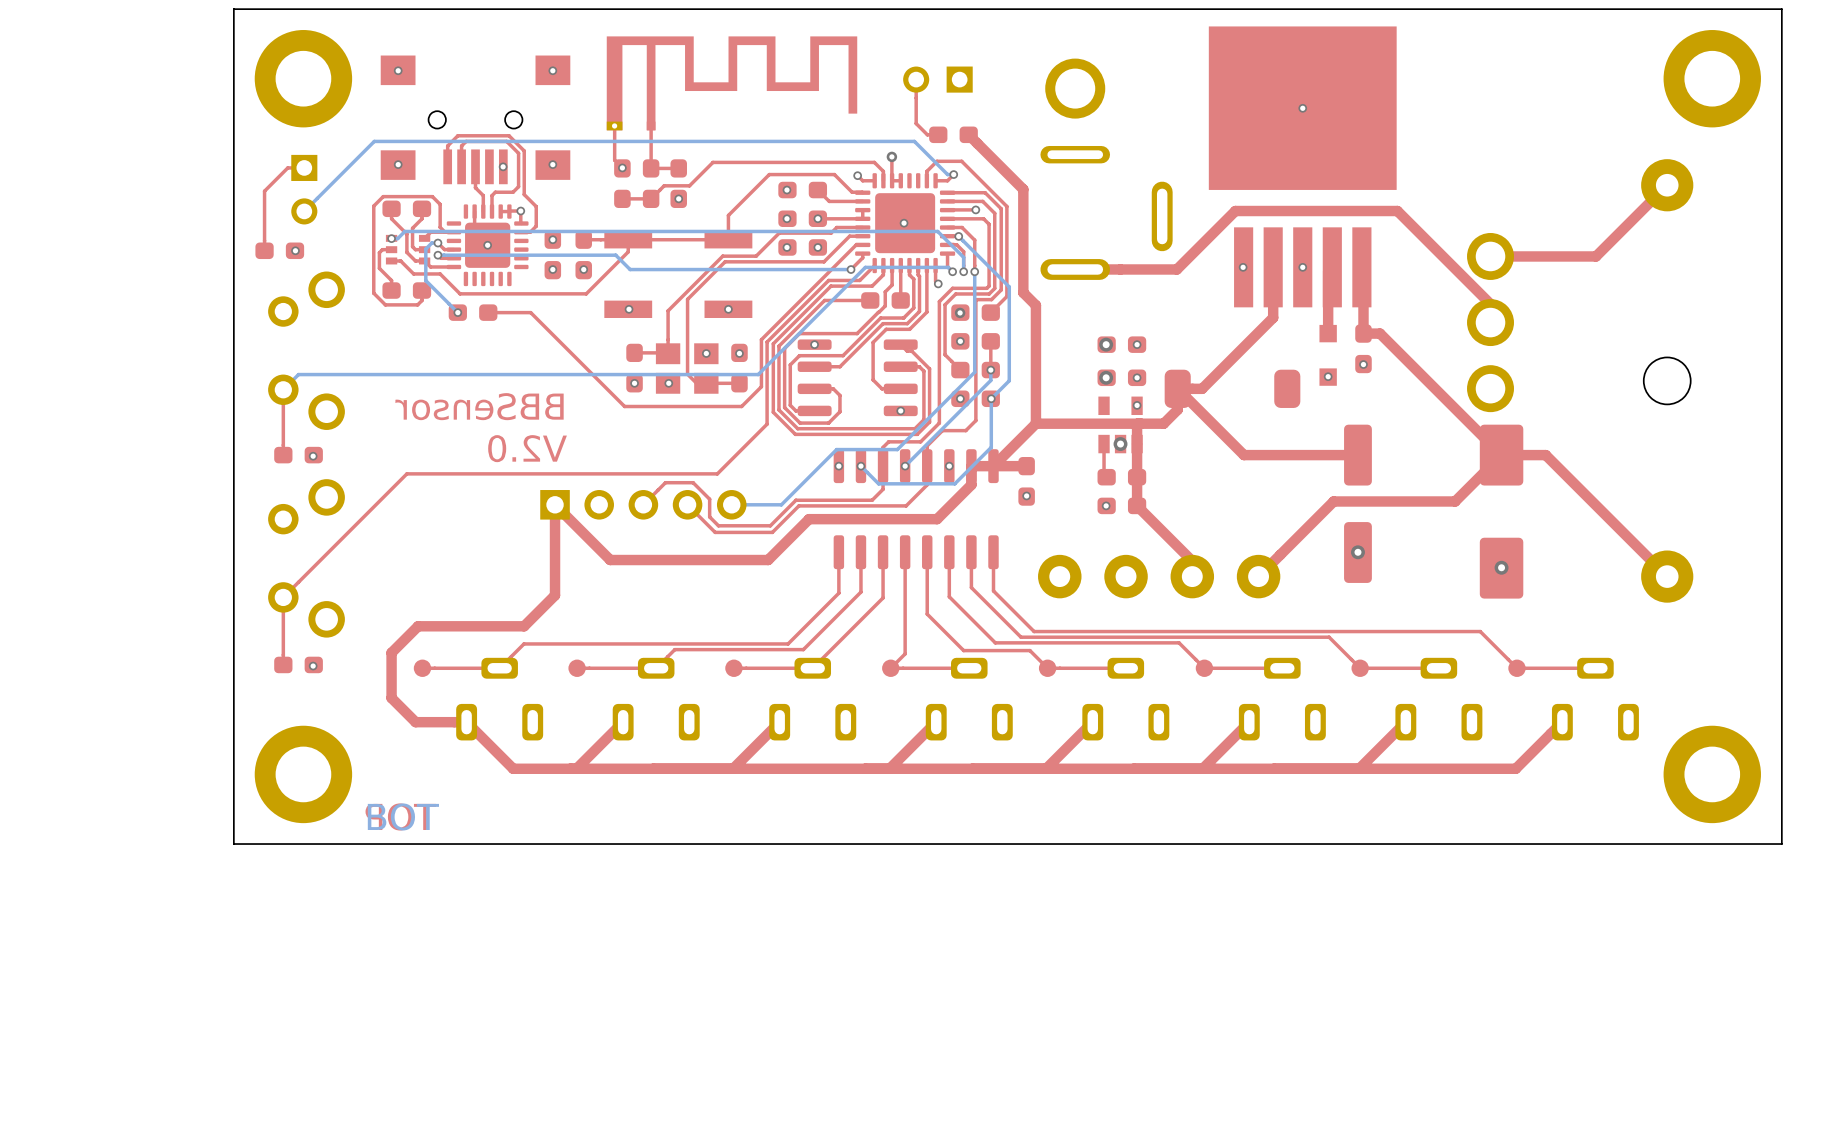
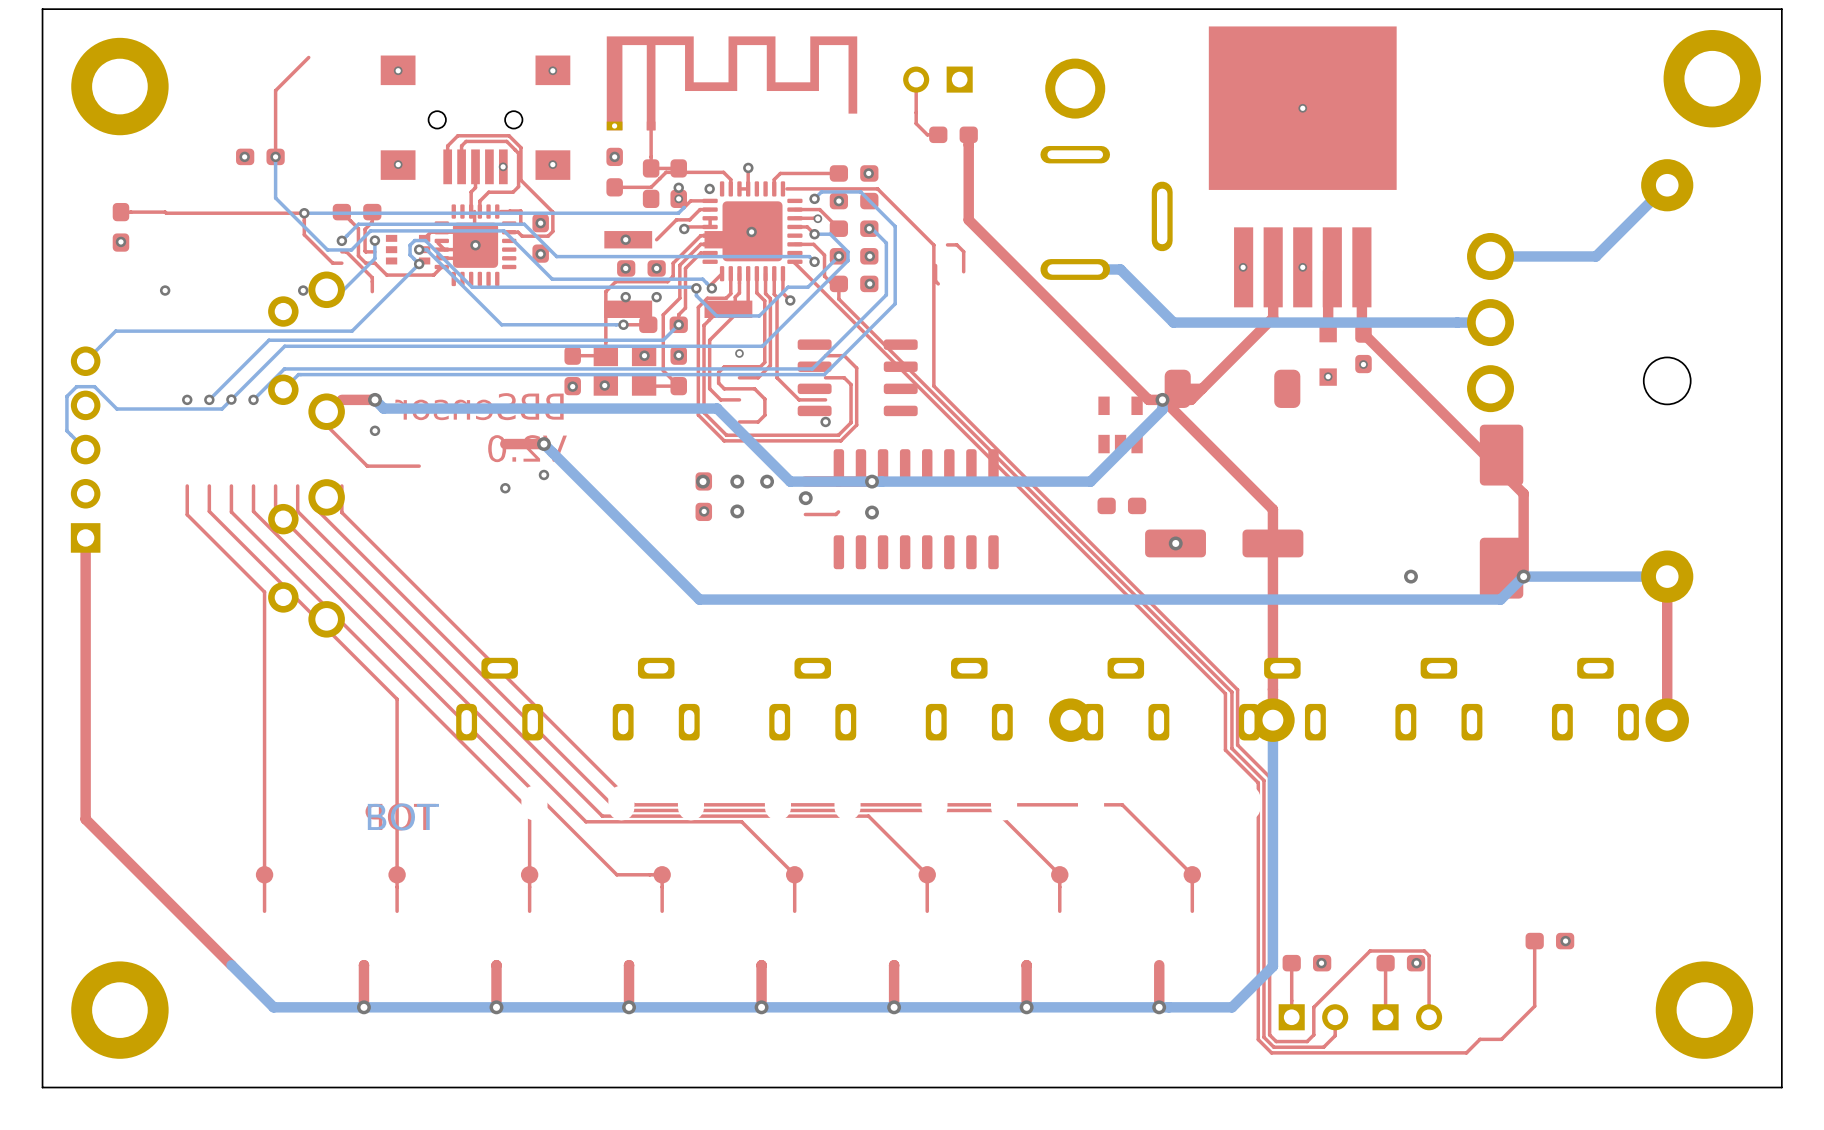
board edge: (233, 9) (233, 844) (1781, 844) -> (233, 9) (42, 9) (42, 1087) (1781, 1087) (1781, 844)
top track: none -> (308, 57) (275, 90) (275, 156)
part position: (303, 78) -> (119, 86)
top track: (614, 126) (614, 160) (622, 167) -> none
top track: (968, 134) (1023, 189) (1023, 292) (1035, 305) (1035, 423) -> (968, 134) (968, 220) (1148, 399) (1191, 399) (1202, 388)
top track: (520, 147) (524, 150) (524, 194) (536, 206) (536, 226) (530, 232) (521, 232) -> (520, 147) (520, 180) (552, 212) (552, 231) (548, 236) (522, 236) (518, 232) (509, 232)
via: none -> (244, 156)
part: none -> (260, 156)
bottom track: none -> (275, 156) (275, 198) (327, 249) (351, 249) (370, 230) (503, 230) (552, 279) (702, 279) (711, 288)
via: none -> (275, 156)
via: none -> (614, 156)
top track: (891, 156) (891, 180) -> none
via position: (891, 156) -> (868, 173)
top track: (304, 167) (287, 167) (264, 191) (264, 250) -> none
via: (622, 167) -> none
via: none -> (748, 167)
top track: none -> (748, 168) (748, 188) (739, 188)
top track: none -> (838, 173) (780, 173) (774, 179) (774, 188)
part: none -> (854, 173)
top track: (953, 174) (947, 180) (935, 180) -> none
bottom track: (953, 174) (947, 174) (914, 141) (374, 141) (304, 211) -> none
via: (953, 174) -> none
top track: (857, 175) (862, 180) (874, 180) -> none
via: (857, 175) -> none
top track: (883, 180) (883, 171) (874, 162) (712, 162) (689, 185) (664, 185) (651, 198) (622, 198) -> none
top track: (900, 180) (892, 180) -> none
top track: (926, 180) (926, 171) (936, 161) (961, 161) (1006, 206) (1006, 296) (990, 312) -> none
part position: (622, 183) -> (614, 172)
top track: (1667, 185) (1596, 256) (1490, 256) -> none
bottom track: none -> (1667, 185) (1596, 256) (1490, 256)
top track: (475, 187) (483, 195) (483, 211) -> (475, 187) (471, 192) (471, 211)
top track: none -> (614, 187) (651, 187) (666, 172) (723, 172) (730, 179) (730, 188)
via: none -> (678, 187)
via: none -> (709, 188)
top track: none -> (786, 188) (877, 188) (933, 245) (933, 386) (1237, 689) (1237, 745) (1269, 777) (1269, 1034) (1276, 1041) (1307, 1041) (1313, 1034) (1313, 1007) (1370, 950) (1424, 950) (1429, 955) (1429, 1017)
part: (304, 189) -> none
via: (786, 190) -> none
part: (802, 190) -> none
top track: (817, 190) (829, 201) (862, 201) -> none
top track: (495, 192) (492, 195) (492, 211) -> (495, 192) (488, 192) (479, 201) (479, 211)
top track: (862, 192) (852, 192) (834, 174) (769, 174) (728, 215) (728, 239) (583, 239) -> none
top track: (947, 192) (985, 192) (1001, 208) (1001, 289) (991, 299) (975, 299) (975, 420) (965, 430) (942, 430) (927, 445) (927, 484) (906, 505) (798, 505) (772, 532) (715, 532) (687, 504) -> none
via: none -> (814, 198)
top track: none -> (710, 200) (690, 200) (684, 207)
via: none -> (838, 201)
part: none -> (854, 201)
top track: (947, 201) (982, 201) (994, 213) (994, 288) (989, 293) (955, 293) (945, 304) (945, 354) (960, 370) -> none
bottom track: none -> (684, 207) (678, 213) (304, 213)
top track: (391, 208) (391, 218) (406, 234) (406, 252) (415, 260) (424, 260) (430, 266) (453, 266) -> none
part: (406, 208) -> none
top track: (422, 208) (422, 218) (412, 228) (412, 246) (415, 249) (424, 249) -> none
top track: none -> (710, 209) (700, 209) (689, 219) (676, 219) (656, 239)
top track: none -> (794, 209) (819, 209) (838, 228)
top track: (975, 209) (947, 209) -> none
via: (975, 209) -> none
top track: (862, 210) (862, 218) (817, 218) -> none
via: (520, 211) -> none
top track: none -> (120, 212) (304, 213) (304, 234) (332, 263) (341, 263)
top track: none -> (341, 212) (358, 228) (358, 255) (365, 263) (374, 263) (386, 275) (433, 275) (441, 266)
part: none -> (357, 212)
top track: none -> (372, 212) (372, 222) (365, 229) (365, 251) (374, 251)
via: none -> (304, 213)
top track: none -> (710, 218) (710, 226) (686, 226) (684, 228)
via: (786, 218) -> none
top track: none -> (794, 218) (814, 218)
part: (802, 218) -> none
top track: (947, 218) (983, 218) (989, 224) (989, 286) (986, 288) (952, 288) (939, 301) (939, 423) (920, 441) (888, 441) (883, 447) (883, 489) (872, 500) (795, 500) (770, 525) (718, 525) (709, 516) (709, 499) (693, 482) (665, 482) (643, 504) -> none
via: none -> (540, 223)
via: (904, 223) -> none
part position: (905, 223) -> (752, 231)
top track: none -> (794, 226) (807, 226) (814, 234)
part: none -> (120, 227)
top track: (862, 227) (836, 227) (831, 233) (779, 233) (756, 256) (722, 256) (668, 310) (668, 353) (634, 352) -> none
top track: (947, 227) (962, 227) (974, 240) (974, 271) -> none
via: none -> (684, 228)
part: none -> (854, 228)
bottom track: none -> (869, 228) (872, 228) (886, 243) (886, 294) (812, 368) (284, 368) (253, 399)
via: none -> (869, 228)
top track: (445, 232) (440, 227) (440, 204) (432, 196) (383, 196) (373, 206) (373, 293) (385, 304) (417, 304) (422, 300) (422, 290) -> none
via: none -> (751, 232)
bottom track: none -> (814, 234) (830, 234) (848, 251) (848, 260) (762, 346) (284, 346) (221, 409) (116, 409) (94, 386) (76, 386) (66, 396) (66, 430) (85, 449)
via: none -> (814, 234)
top track: none -> (710, 235) (700, 235) (673, 263) (673, 276) (667, 281) (615, 281) (605, 291) (605, 355) (572, 355)
top track: (862, 236) (849, 236) (824, 261) (725, 261) (687, 299) (687, 374) (696, 383) (739, 383) -> none
bottom track: (958, 236) (1009, 286) (1009, 380) (991, 398) (991, 447) (954, 483) (878, 483) (860, 466) -> none
via: (958, 236) -> none
bottom track: (391, 238) (397, 238) (404, 231) (937, 231) (963, 257) (963, 271) -> none
via: (391, 238) -> none
via: (552, 239) -> none
via: none -> (625, 239)
top track: (628, 239) (628, 251) (586, 293) (460, 293) (440, 273) (413, 273) (400, 260) (391, 260) -> none
bottom track: none -> (341, 240) (358, 224) (524, 224) (556, 256) (809, 256) (814, 261)
via: none -> (341, 240)
bottom track: none -> (374, 240) (374, 258) (341, 291)
via: none -> (374, 240)
via: none -> (120, 241)
bottom track: (437, 243) (431, 243) (425, 249) (425, 280) (457, 312) -> none
via: (437, 243) -> none
top track: none -> (710, 244) (700, 244) (679, 265) (679, 298) (663, 314) (663, 370) (678, 386) (644, 385)
top track: none -> (794, 244) (813, 244) (824, 255) (824, 276) (832, 283) (838, 283) (838, 299) (1231, 692) (1231, 748) (1263, 780) (1263, 1037) (1273, 1047) (1323, 1047) (1335, 1035) (1335, 1017)
top track: (862, 244) (856, 244) (761, 339) (761, 386) (741, 406) (624, 406) (530, 312) (488, 312) -> none
via: none -> (475, 245)
part position: (487, 245) -> (475, 245)
via: (487, 245) -> none
via: (786, 247) -> none
part: (802, 247) -> none
via: (817, 247) -> none
top track: (391, 249) (382, 249) (379, 252) (379, 268) (391, 280) (391, 290) -> none
bottom track: none -> (419, 249) (426, 249) (501, 324) (623, 324)
via: none -> (419, 249)
part: (279, 250) -> none
via: (295, 250) -> none
top track: none -> (341, 251) (346, 251) (372, 277) (372, 291)
top track: none -> (710, 253) (700, 253) (685, 268) (685, 308) (678, 314) (678, 324)
top track: (862, 253) (862, 257) (851, 269) -> none
top track: (947, 253) (947, 266) (952, 271) -> none
via: none -> (540, 254)
part position: (552, 254) -> (540, 238)
part: (583, 254) -> none
bottom track: (437, 255) (615, 255) (630, 269) (851, 269) -> none
via: (437, 255) -> none
bottom track: none -> (838, 256) (807, 287) (788, 287) (759, 315) (716, 315) (696, 295) (695, 287) (472, 287) (425, 240) (414, 240) (410, 245) (410, 254) (419, 264) (352, 331) (115, 331) (85, 361)
via: none -> (838, 256)
part: none -> (854, 256)
via: none -> (869, 256)
top track: none -> (794, 261) (1225, 693) (1225, 749) (1258, 782) (1258, 1039) (1271, 1052) (1466, 1052) (1480, 1039) (1501, 1039) (1534, 1006) (1534, 941)
via: none -> (814, 261)
via: none -> (419, 264)
top track: (874, 265) (859, 280) (828, 280) (767, 342) (767, 424) (717, 473) (406, 473) (283, 597) (283, 664) -> none
top track: (883, 265) (883, 274) (872, 286) (830, 286) (773, 343) (773, 412) (795, 434) (917, 434) (929, 422) (929, 368) (911, 351) (907, 351) (900, 344) -> none
top track: (892, 265) (892, 285) (885, 291) (885, 306) (857, 333) (799, 333) (784, 348) (784, 407) (800, 423) (828, 423) (839, 411) (839, 395) (833, 388) (814, 388) -> none
top track: (900, 265) (900, 300) -> none
top track: (909, 265) (909, 274) (913, 279) (913, 307) (903, 318) (880, 318) (843, 355) -> (730, 273) (730, 293) (726, 298) (707, 298) (698, 307) (698, 415) (724, 440) (840, 440) (856, 425) (856, 368) (843, 355)
top track: (918, 265) (919, 311) (907, 323) (883, 323) (839, 366) (814, 366) -> none
top track: (926, 265) (926, 312) (909, 329) (886, 329) (873, 342) (873, 379) (882, 388) (900, 388) -> none
top track: (1361, 267) (1363, 268) (1363, 333) (1380, 333) (1501, 455) -> (1361, 267) (1361, 332) (1523, 493) (1523, 576)
via: none -> (625, 268)
part: none -> (641, 268)
via: none -> (656, 268)
via: (552, 269) -> none
via: (583, 269) -> none
via: (851, 269) -> none
top track: (1075, 269) (1176, 269) (1235, 211) (1397, 211) (1490, 304) (1490, 322) -> none
bottom track: none -> (1075, 269) (1120, 269) (1173, 322) (1490, 322)
bottom track: (952, 271) (948, 267) (865, 267) (758, 374) -> (814, 198) (821, 191) (860, 191) (895, 226) (895, 303) (824, 374) (758, 374)
via: (952, 271) -> none
via: (963, 271) -> none
bottom track: (974, 271) (974, 372) (897, 449) (836, 449) (781, 504) (731, 504) -> none
via: (974, 271) -> none
top track: none -> (722, 273) (711, 283) (711, 288)
top track: none -> (739, 273) (739, 293) (735, 297) (735, 314) (709, 340) (709, 388) (720, 399) (739, 399)
top track: none -> (748, 273) (748, 311)
top track: none -> (756, 273) (756, 292) (764, 300) (764, 362) (760, 366) (724, 366) (718, 372) (718, 383) (724, 388) (754, 388) (764, 399) (764, 415) (758, 421) (739, 421)
top track: none -> (765, 273) (765, 293) (770, 298) (770, 365) (758, 377) (739, 377)
top track: none -> (774, 273) (774, 294) (777, 297) (777, 377) (799, 399) (825, 399)
top track: none -> (782, 273) (782, 293) (790, 300)
part: none -> (854, 283)
via: none -> (869, 283)
via: (938, 283) -> none
via: none -> (696, 288)
via: none -> (711, 288)
via: none -> (165, 290)
via: none -> (303, 290)
part: (406, 290) -> none
via: none -> (625, 297)
via: none -> (656, 297)
via: none -> (790, 300)
top track: (870, 300) (824, 300) (778, 346) (778, 409) (797, 428) (914, 428) (923, 419) (923, 371) (919, 366) (900, 366) -> none
part: (885, 300) -> none
via: (629, 309) -> none
via: (728, 309) -> none
top track: none -> (717, 311) (704, 325) (704, 412) (726, 435) (838, 435) (851, 422) (851, 384) (844, 377) (825, 377)
via: (457, 312) -> none
part: (473, 312) -> none
via: (960, 312) -> none
part: (975, 312) -> none
via: none -> (623, 324)
top track: none -> (648, 324) (623, 324)
part: none -> (663, 324)
bottom track: none -> (678, 324) (663, 340) (268, 340) (209, 399)
via: none -> (678, 324)
via: (960, 341) -> none
part: (975, 341) -> none
top track: (990, 341) (990, 370) -> none
part footprint: [626, 343, 643, 393] -> [593, 345, 657, 396]
part footprint: [655, 343, 719, 394] -> [670, 346, 687, 396]
via: (814, 344) -> none
via: (1106, 344) -> none
part: (1121, 344) -> none
via: (1137, 344) -> none
via: (706, 353) -> none
via: none -> (644, 355)
via: none -> (678, 355)
top track: (825, 355) (799, 355) (790, 364) (790, 405) (795, 410) (814, 410) -> none
part: (739, 368) -> none
part: none -> (572, 370)
part: (975, 370) -> none
bottom track: (990, 370) (990, 380) (905, 466) -> none
via: (990, 370) -> none
via: (1106, 377) -> none
part: (1121, 377) -> none
via: (1137, 377) -> none
via: (634, 383) -> none
via: (668, 383) -> none
via: none -> (604, 385)
via: none -> (572, 386)
top track: (283, 389) (283, 455) -> none
via: (960, 398) -> none
part: (975, 398) -> none
via: (991, 398) -> none
via: none -> (187, 399)
via: none -> (209, 399)
via: none -> (231, 399)
via: none -> (253, 399)
top track: none -> (319, 399) (319, 418) (367, 466) (419, 466)
top track: none -> (375, 399) (341, 399)
via: none -> (375, 399)
bottom track: none -> (1162, 399) (1162, 409) (1090, 481) (790, 481) (717, 408) (383, 408) (375, 399)
via: none -> (1162, 399)
top track: none -> (1163, 399) (1272, 509) (1272, 720)
via: (1137, 405) -> none
via: (900, 410) -> none
via: none -> (825, 421)
top track: (1035, 423) (993, 466) -> none
top track: (1035, 423) (1163, 423) (1177, 409) (1177, 388) (1243, 455) (1357, 455) -> none
top track: (1137, 423) (1137, 505) (1192, 561) (1192, 576) -> none
via: none -> (375, 430)
top track: none -> (543, 444) (505, 444)
bottom track: none -> (543, 444) (699, 599) (1500, 599) (1523, 576) (1667, 576)
via: none -> (543, 444)
top track: (1104, 444) (1104, 474) (1106, 477) -> none
via: (1120, 444) -> none
part: none -> (85, 449)
part: (298, 455) -> none
top track: (1501, 455) (1545, 455) (1667, 576) -> (1667, 720) (1667, 576)
top track: (1501, 455) (1455, 501) (1333, 501) (1258, 576) -> none
via: (313, 456) -> none
via: (838, 466) -> none
via: (860, 466) -> none
via: (905, 466) -> none
via: (949, 466) -> none
top track: (1026, 466) (971, 466) (971, 484) (937, 519) (809, 519) (768, 560) (610, 560) (555, 504) (555, 595) (524, 626) (418, 626) (391, 652) (391, 698) (415, 722) (466, 722) (513, 768) (1515, 768) (1562, 722) -> none
via: none -> (543, 474)
part: (1121, 477) -> none
via: none -> (703, 481)
via: none -> (737, 481)
via: none -> (767, 481)
via: none -> (872, 481)
part: (1026, 481) -> none
top track: none -> (187, 485) (187, 514) (264, 592) (264, 911)
top track: none -> (209, 485) (209, 511) (397, 699) (397, 911)
top track: none -> (231, 485) (231, 511) (529, 810) (529, 911)
top track: none -> (253, 485) (253, 511) (616, 874) (662, 874) (662, 911)
top track: none -> (275, 485) (275, 511) (585, 821) (741, 821) (794, 874) (794, 911)
top track: none -> (297, 485) (297, 511) (602, 816) (868, 816) (927, 874) (927, 911)
top track: none -> (319, 485) (319, 512) (617, 810) (995, 810) (1059, 874) (1059, 911)
top track: none -> (341, 485) (341, 512) (634, 804) (1122, 804) (1192, 874) (1192, 911)
via: none -> (505, 488)
via: (1026, 495) -> none
part: none -> (703, 496)
via: none -> (805, 498)
part rotation: 0° (1357, 503) -> 90° clockwise (1224, 543)
part position: (1357, 503) -> (1224, 543)
part: (643, 504) -> none
via: (1106, 505) -> none
via: none -> (704, 511)
via: none -> (737, 511)
top track: none -> (838, 511) (835, 514) (805, 514)
via: none -> (872, 512)
top track: none -> (85, 537) (85, 819) (231, 965)
via: none -> (1175, 543)
top track: (838, 552) (838, 593) (788, 643) (523, 643) (499, 668) (422, 668) -> none
top track: (860, 552) (860, 592) (803, 649) (674, 649) (656, 668) (577, 668) -> none
top track: (883, 552) (883, 597) (812, 668) (733, 668) -> none
top track: (905, 552) (905, 653) (890, 668) (969, 668) -> none
top track: (927, 552) (927, 614) (963, 650) (1029, 650) (1047, 668) (1125, 668) -> none
top track: (949, 552) (949, 596) (995, 642) (1179, 642) (1204, 668) (1282, 668) -> none
top track: (971, 552) (971, 587) (1020, 637) (1329, 637) (1360, 668) (1438, 668) -> none
top track: (993, 552) (993, 590) (1034, 631) (1480, 631) (1517, 668) (1595, 668) -> none
via: (1357, 552) -> none
via position: (1501, 567) -> (1523, 576)
part: (1059, 576) -> none
part: (1126, 576) -> none
part: (1192, 576) -> none
part: (1258, 576) -> none
via: none -> (1410, 576)
part: (298, 664) -> none
via: (313, 666) -> none
part: (422, 668) -> none
part: (577, 668) -> none
part: (733, 668) -> none
part: (890, 668) -> none
part: (1047, 668) -> none
part: (1204, 668) -> none
part: (1360, 668) -> none
part: (1517, 668) -> none
part: none -> (1070, 720)
bottom track: none -> (1272, 720) (1272, 966) (1232, 1007) (273, 1007) (231, 965)
part: none -> (1272, 720)
part: none -> (1667, 720)
top track: (623, 722) (576, 768) -> none
top track: (779, 722) (733, 768) -> none
top track: (936, 722) (889, 768) -> none
top track: (1092, 722) (1046, 768) -> none
top track: (1249, 722) (1202, 768) -> none
top track: (1405, 722) (1359, 768) -> none
part position: (303, 774) -> (119, 1010)
part position: (1712, 774) -> (1704, 1010)
part: none -> (264, 874)
part: none -> (397, 874)
part: none -> (529, 874)
part: none -> (662, 874)
part: none -> (794, 874)
part: none -> (927, 874)
part: none -> (1059, 874)
part: none -> (1192, 874)
part: none -> (1549, 941)
via: none -> (1565, 941)
top track: none -> (1291, 963) (1291, 1017)
part: none -> (1306, 963)
via: none -> (1321, 963)
top track: none -> (1385, 963) (1385, 1017)
part: none -> (1400, 963)
via: none -> (1416, 963)
top track: none -> (363, 965) (363, 1007)
top track: none -> (496, 965) (496, 1007)
top track: none -> (629, 965) (629, 1007)
top track: none -> (761, 965) (761, 1007)
top track: none -> (894, 965) (894, 1007)
top track: none -> (1026, 965) (1026, 1007)
top track: none -> (1159, 965) (1159, 1007)
via: none -> (363, 1007)
via: none -> (496, 1007)
via: none -> (629, 1007)
via: none -> (761, 1007)
via: none -> (894, 1007)
via: none -> (1026, 1007)
via: none -> (1159, 1007)
part: none -> (1313, 1017)
part: none -> (1407, 1017)

